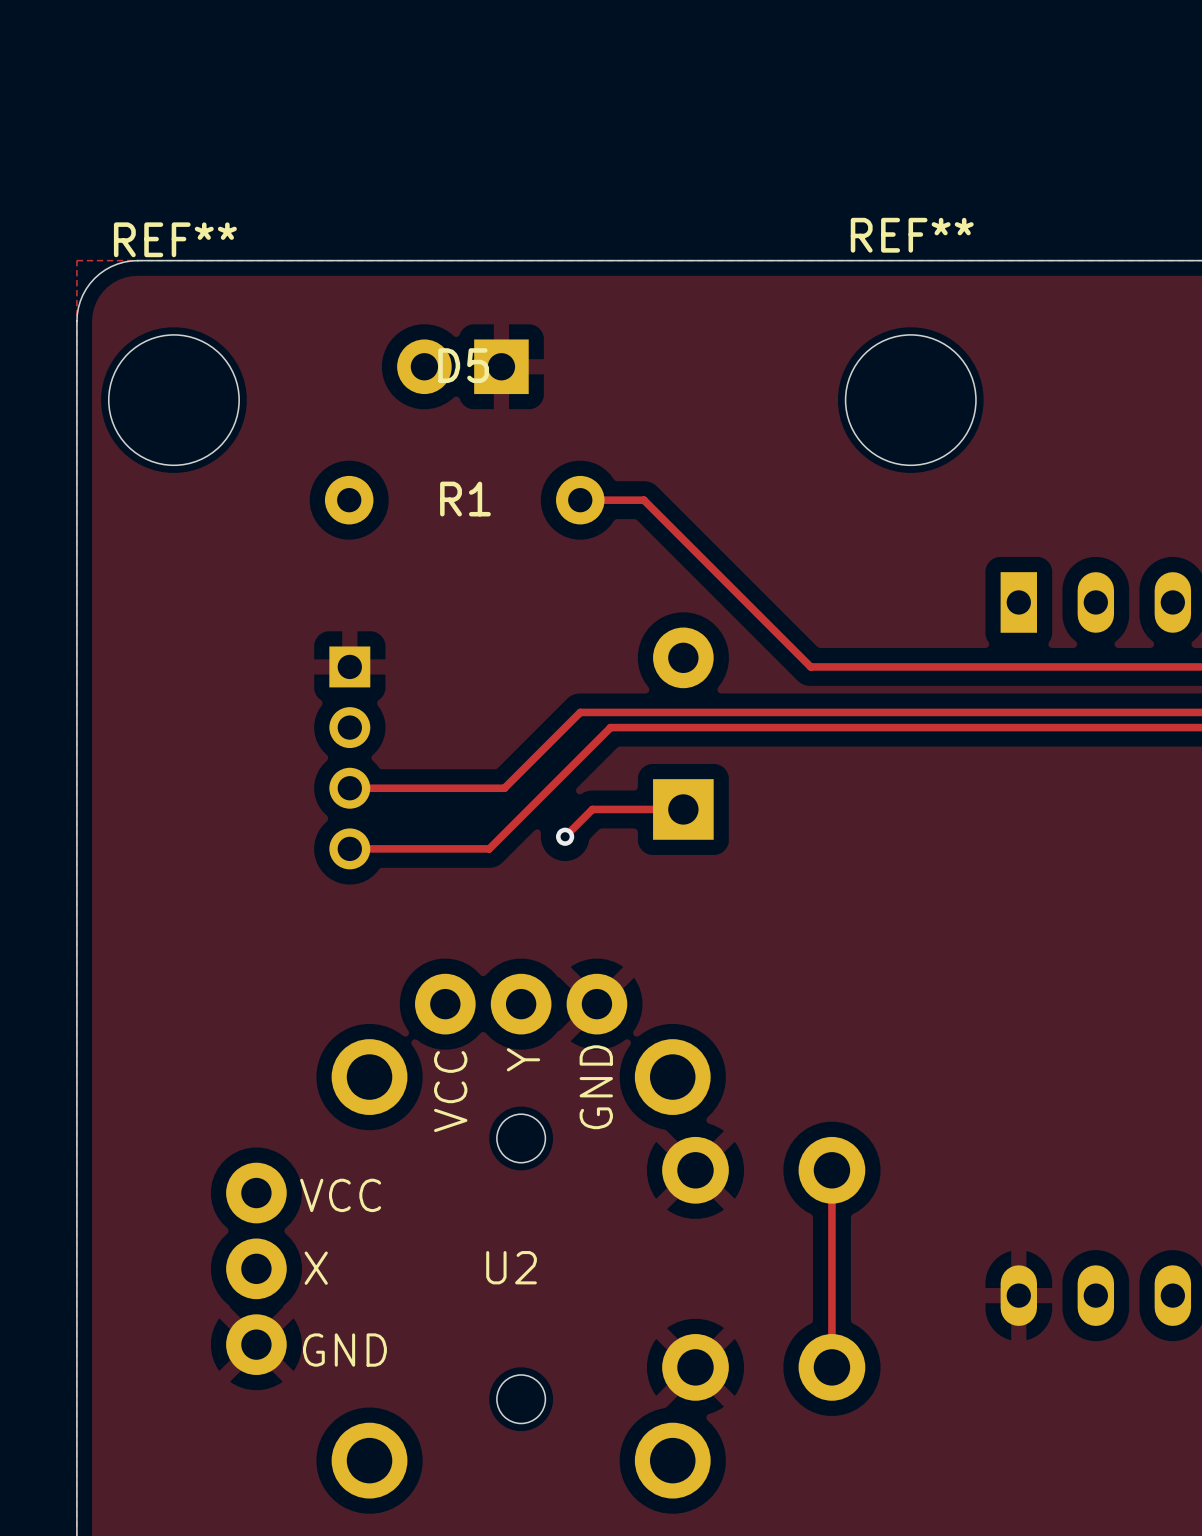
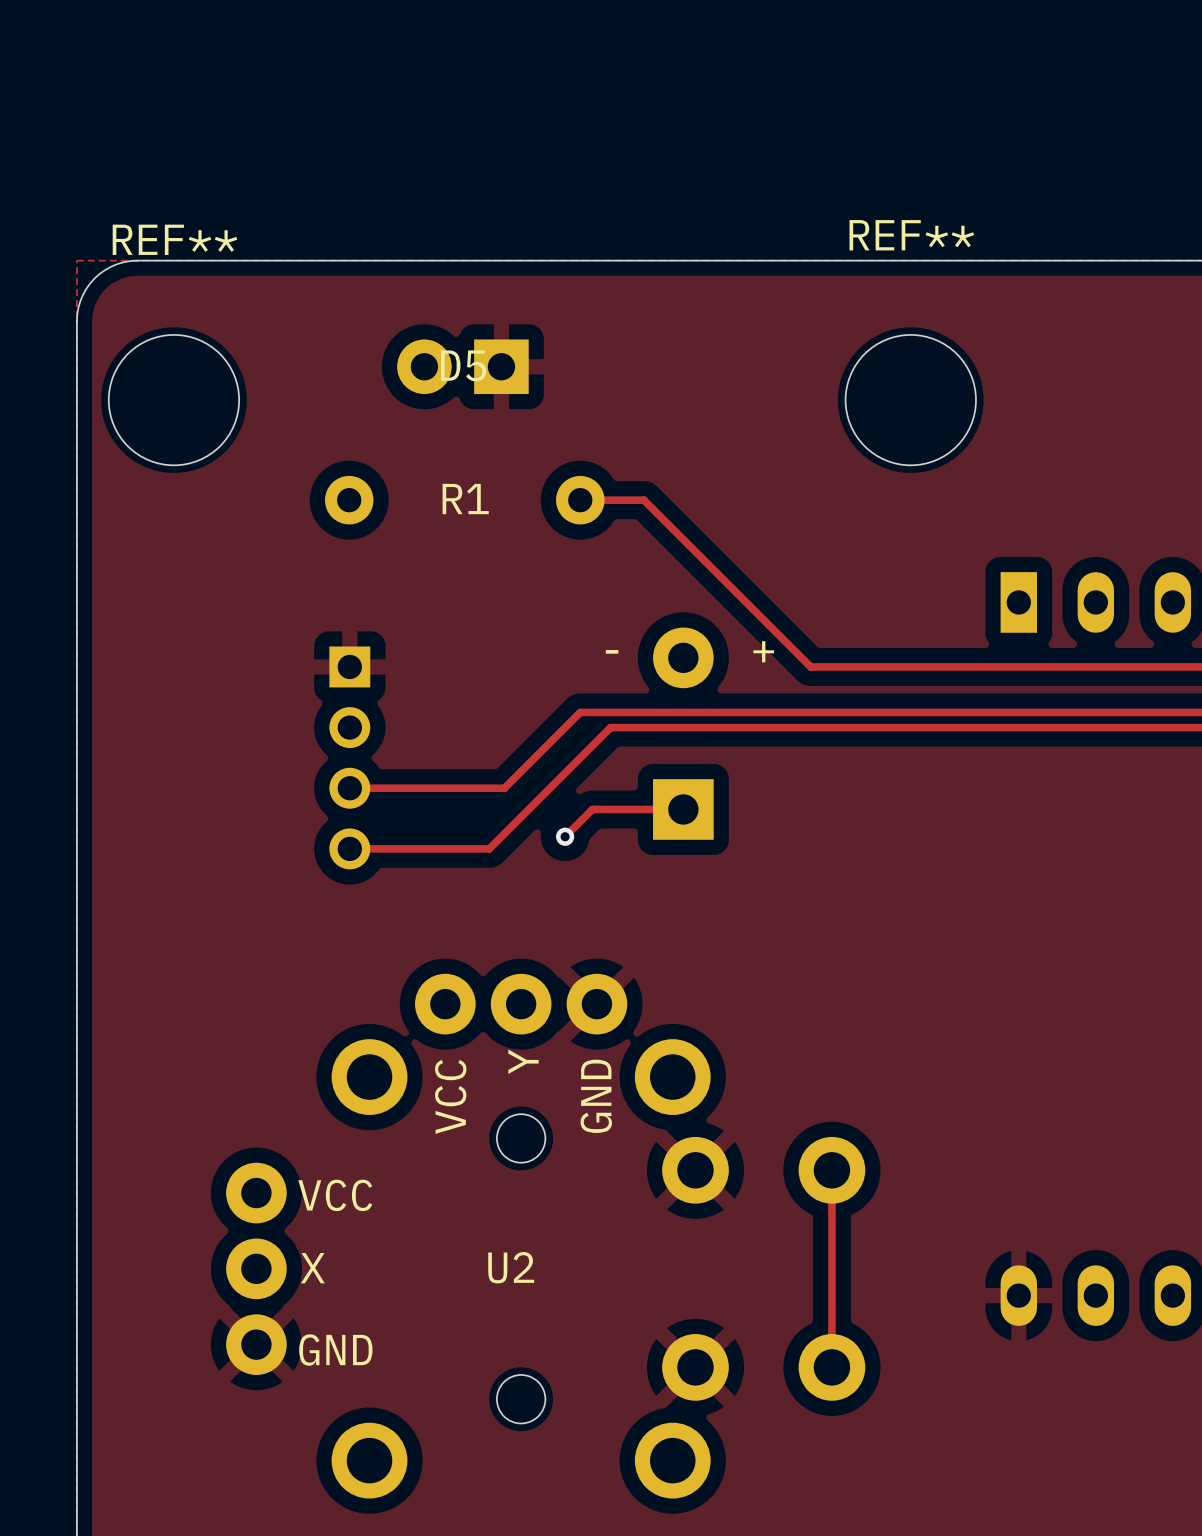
text: none -> - (612, 651)
text: none -> + (763, 651)

